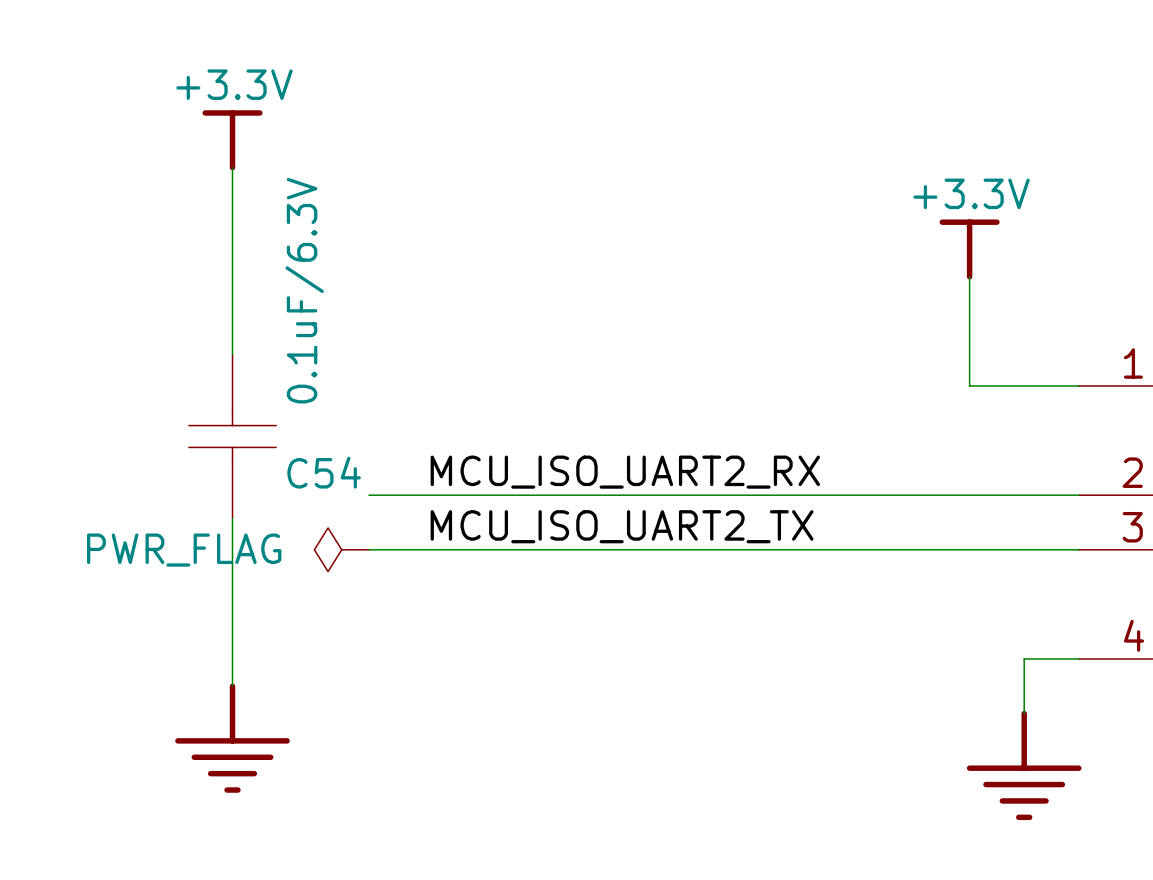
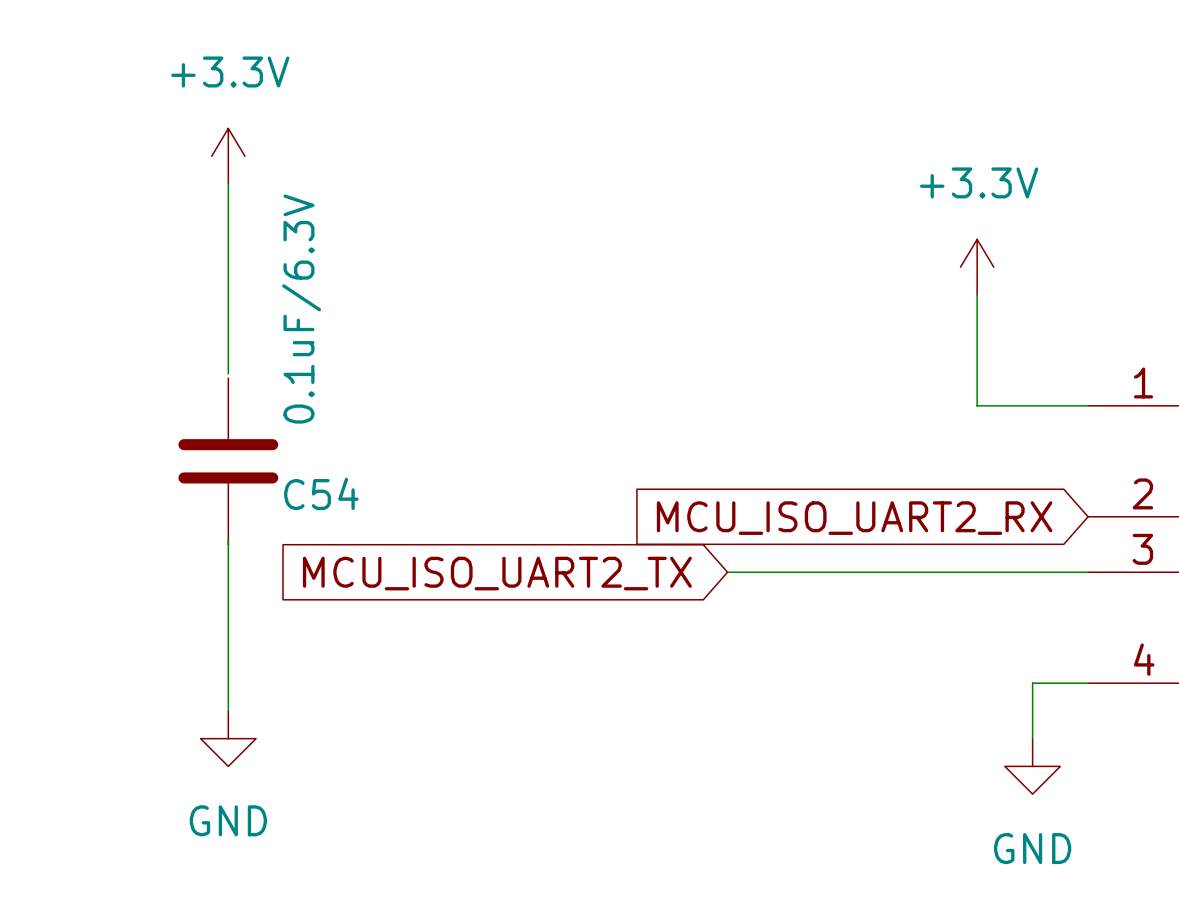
power symbol shape: [202, 110, 263, 171] -> [211, 128, 245, 184]
power symbol shape: [939, 219, 1000, 280] -> [960, 239, 994, 295]
C54 symbol: [188, 354, 277, 519] -> [178, 378, 279, 545]
label: MCU_ISO_UART2_RX (625, 472) -> none
wire: (369, 495) (1078, 495) -> none
global label: none -> MCU_ISO_UART2_RX (854, 518)
label: MCU_ISO_UART2_TX (622, 526) -> none
power symbol: PWR_FLAG (341, 549) -> none
wire: (369, 549) (723, 549) -> none
global label: none -> MCU_ISO_UART2_TX (497, 573)
power symbol: none -> GND (228, 738)
power symbol: (232, 738) -> none
power symbol: none -> GND (1032, 766)
power symbol: (1024, 765) -> none

